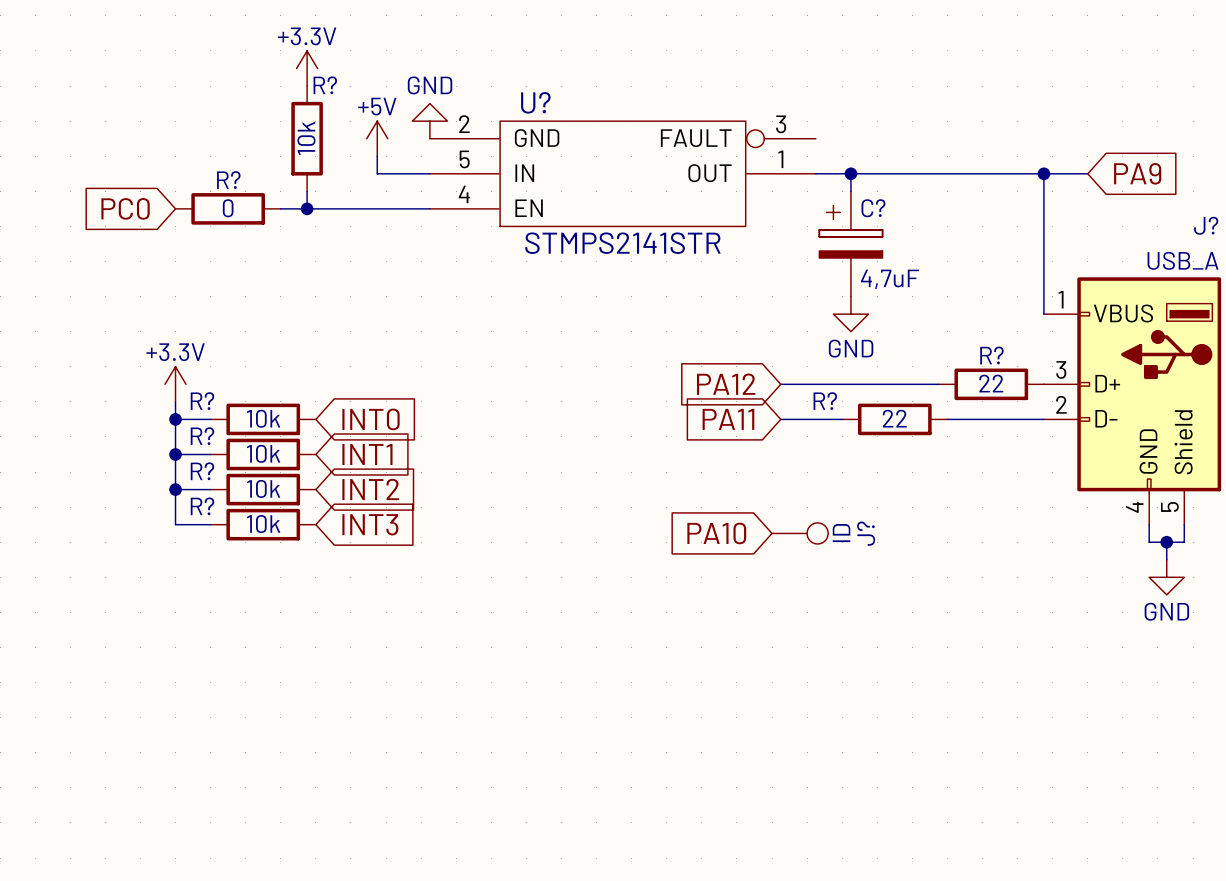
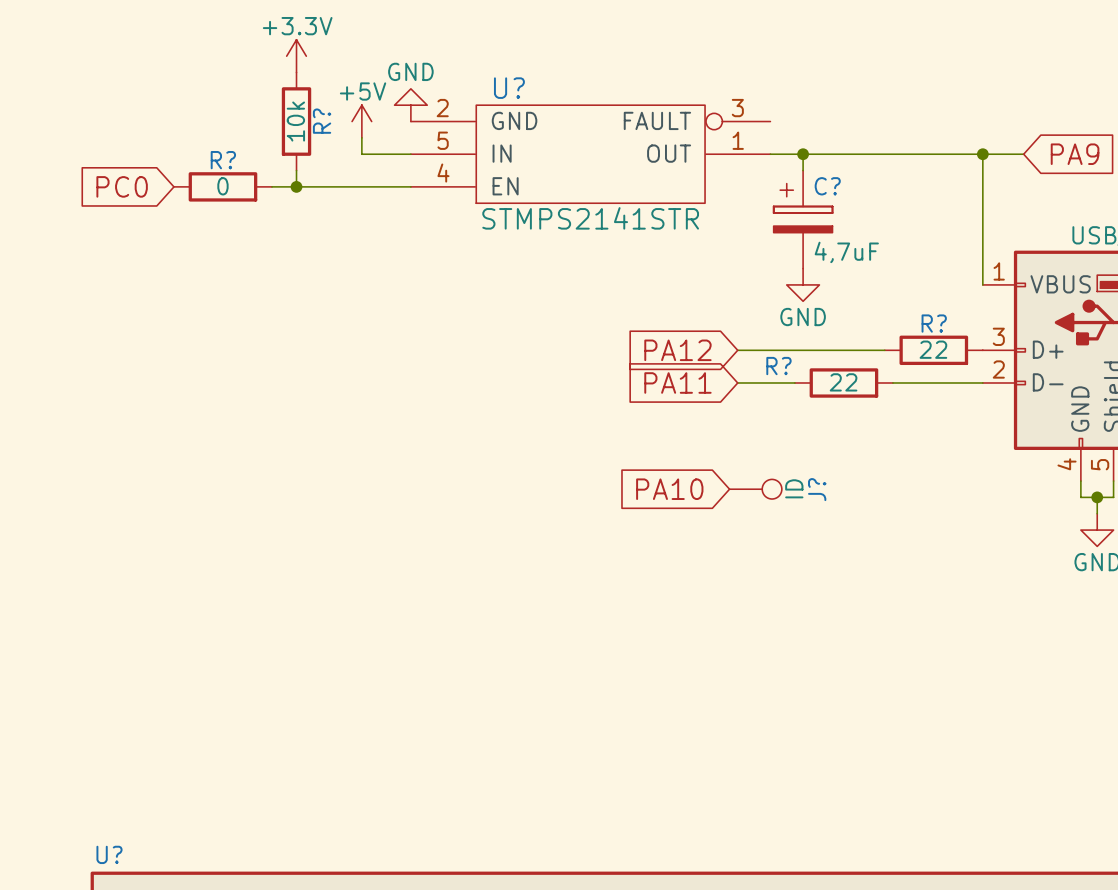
R? name rotation: 0° (325, 85) -> 90° counterclockwise (322, 121)
R? name position: R? (325, 85) -> R? (322, 121)
power symbol: +3.3V (175, 384) -> none
wire: (175, 401) (175, 524) (210, 524) -> none
wire: (175, 419) (210, 419) -> none
junction: (175, 419) -> none
R?: 10k (263, 419) -> none
global label: INT0 (371, 419) -> none
wire: (175, 454) (210, 454) -> none
junction: (175, 454) -> none
R?: 10k (263, 454) -> none
global label: INT1 (367, 454) -> none
wire: (175, 489) (210, 489) -> none
junction: (175, 489) -> none
R?: 10k (263, 489) -> none
global label: INT2 (370, 489) -> none
R?: 10k (263, 524) -> none
global label: INT3 (370, 524) -> none

